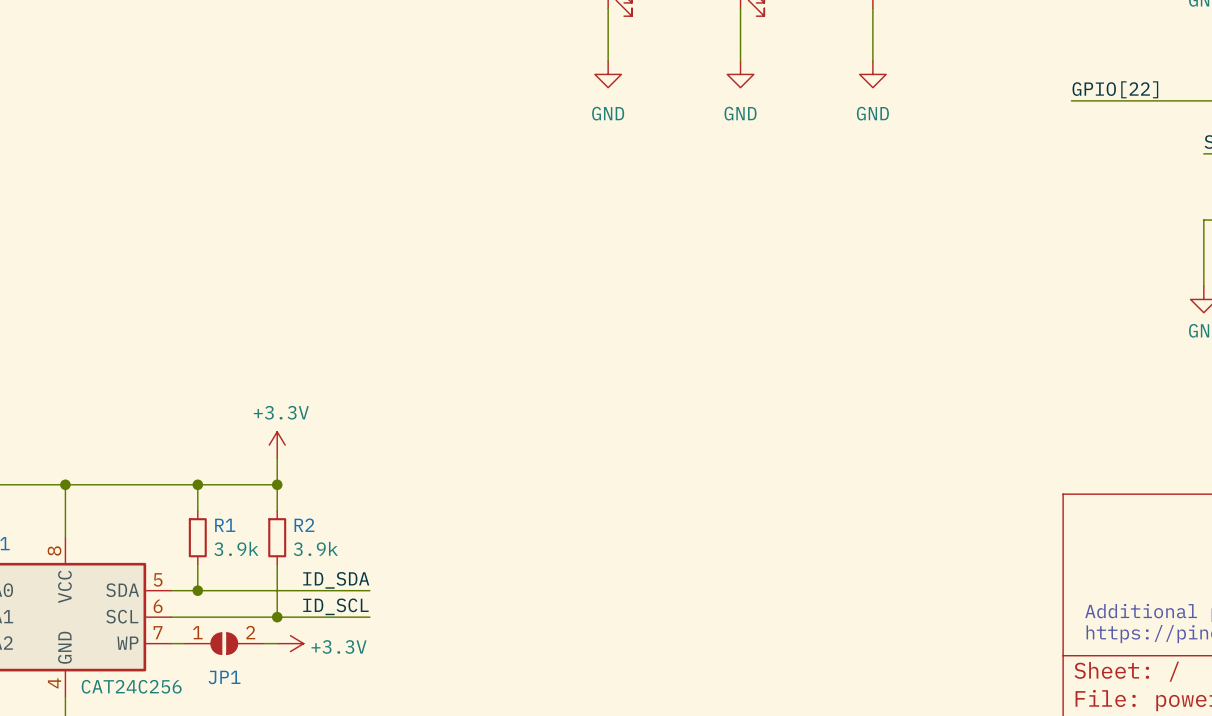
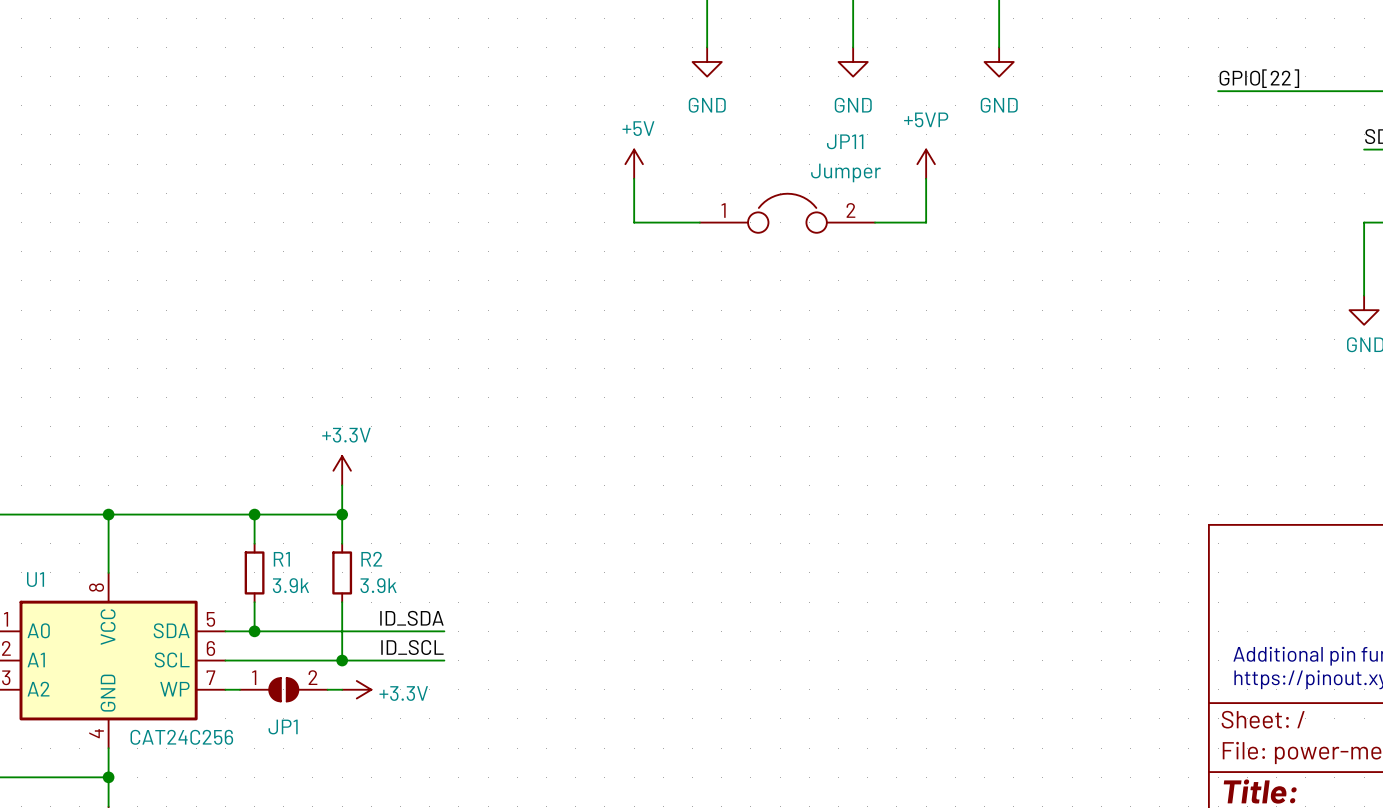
power symbol: none -> +5V (634, 164)
power symbol: none -> +5VP (926, 164)
wire: none -> (634, 178) (634, 222) (699, 222)
wire: none -> (926, 178) (926, 222) (875, 222)
JP11: none -> Jumper (787, 213)

